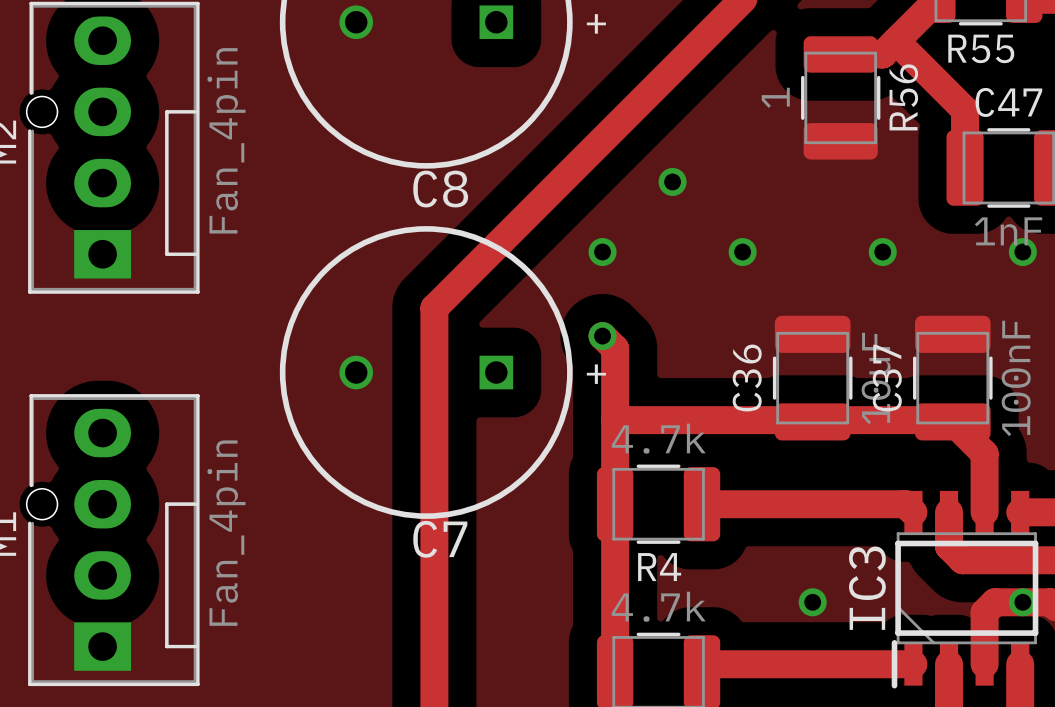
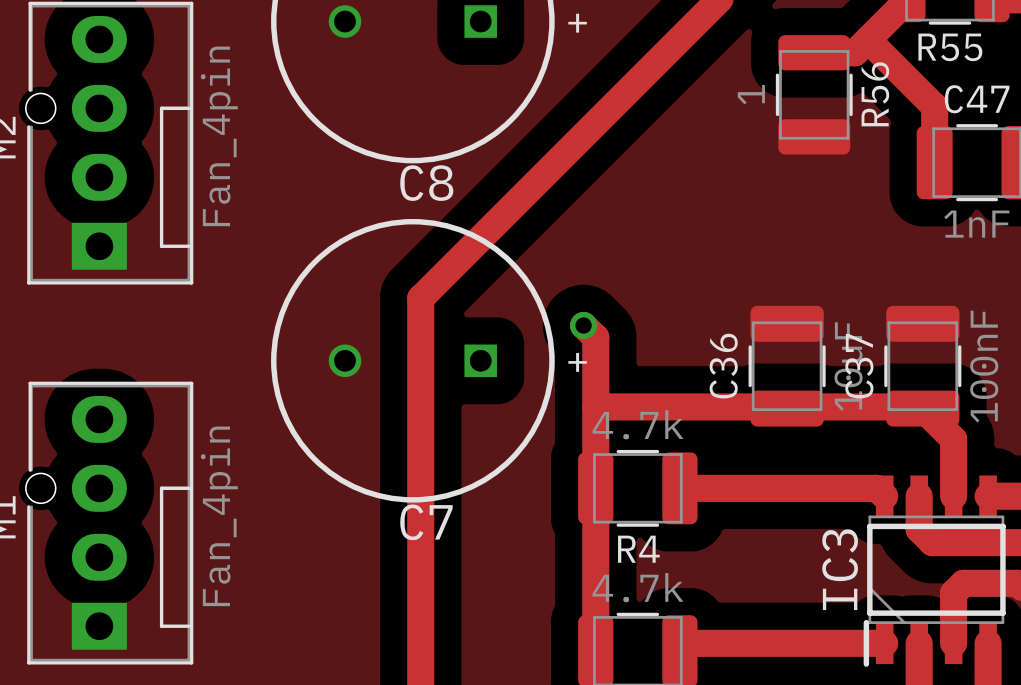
via: (672, 181) -> none
via: (602, 252) -> none
via: (742, 252) -> none
via: (882, 252) -> none
via: (1022, 252) -> none
via: (812, 602) -> none
via: (1022, 602) -> none

